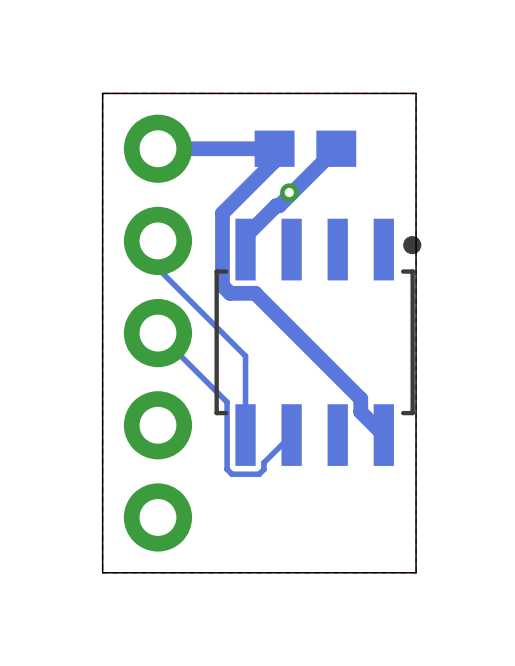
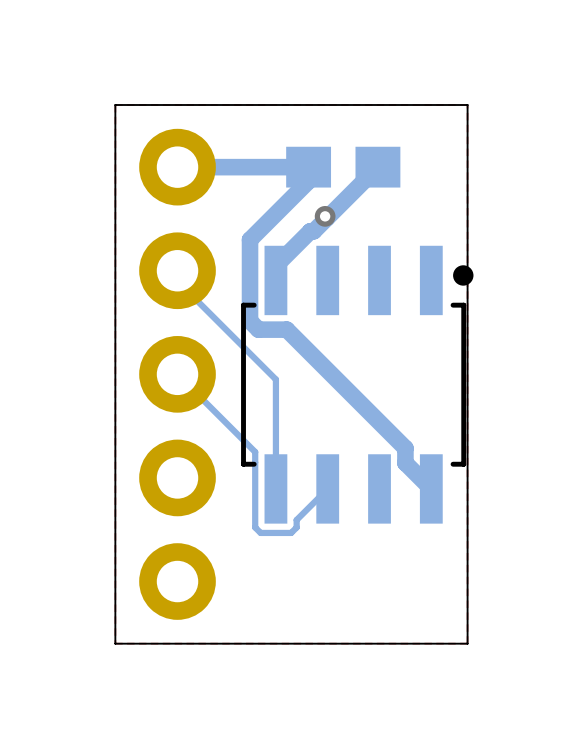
bottom track: (157, 240) (157, 268) (245, 356) -> (167, 270) (275, 379) (275, 400)

